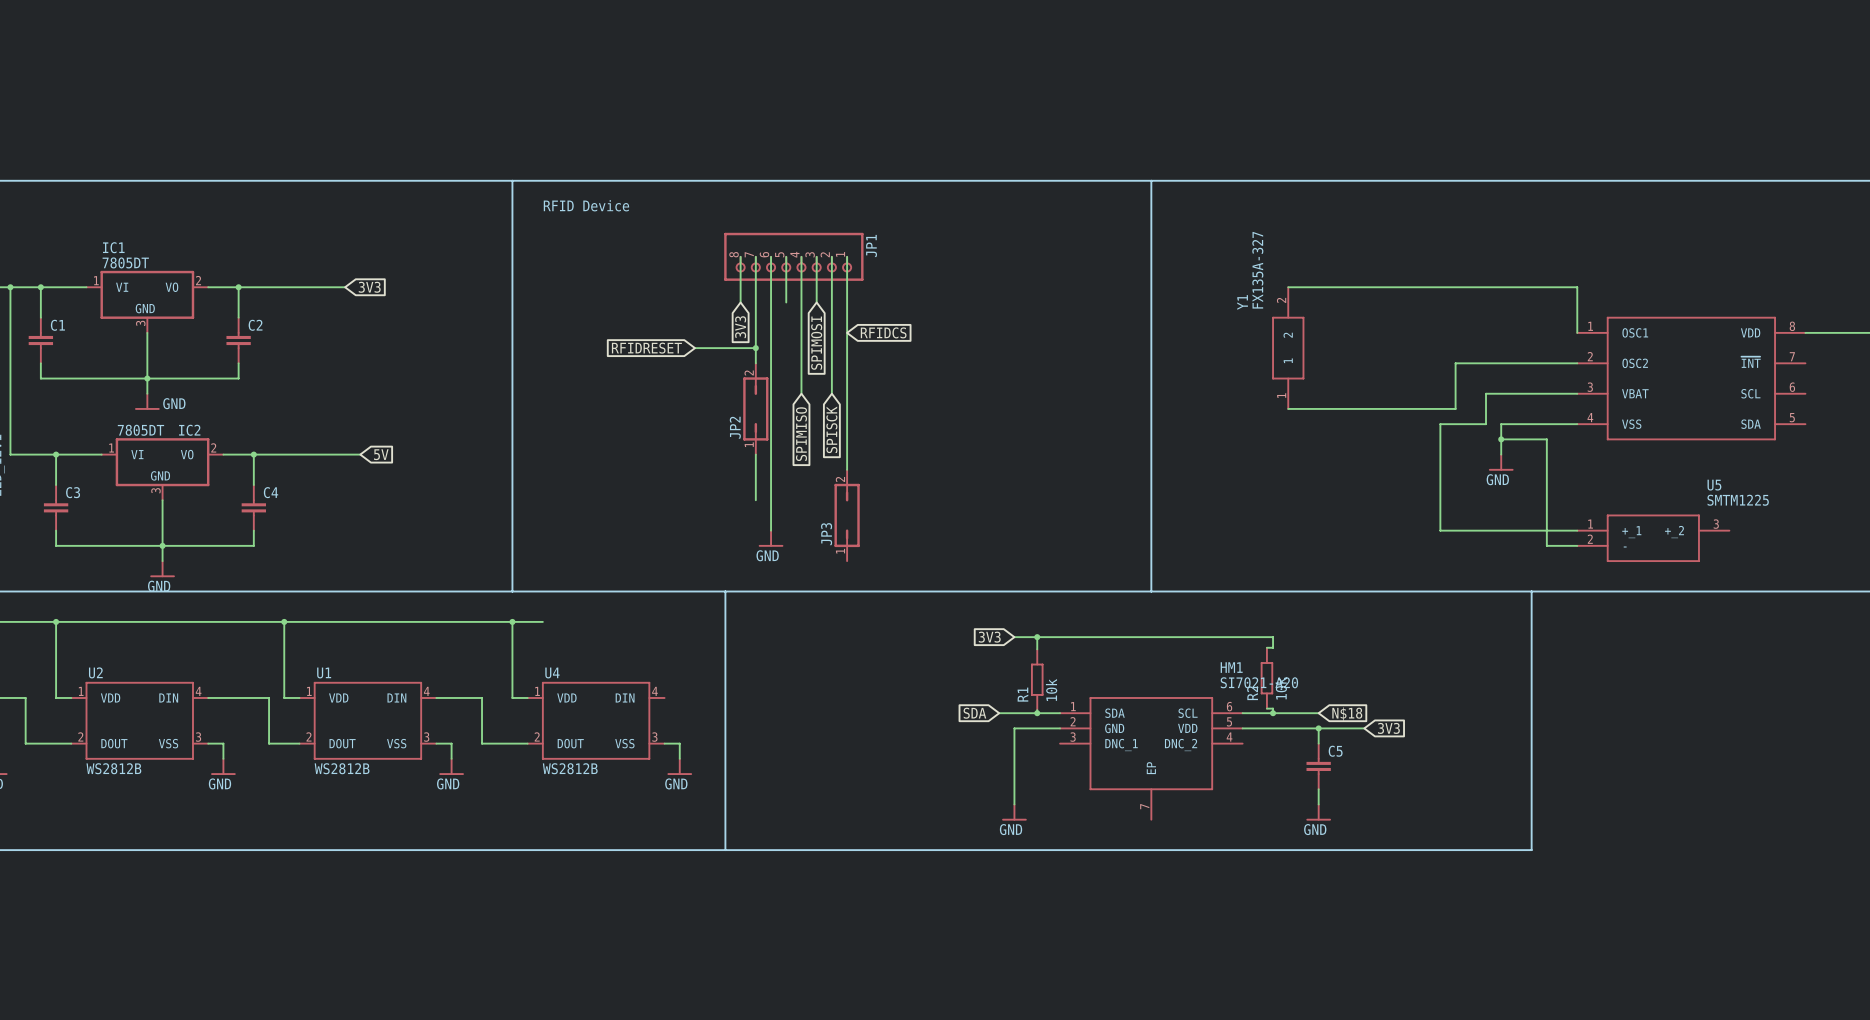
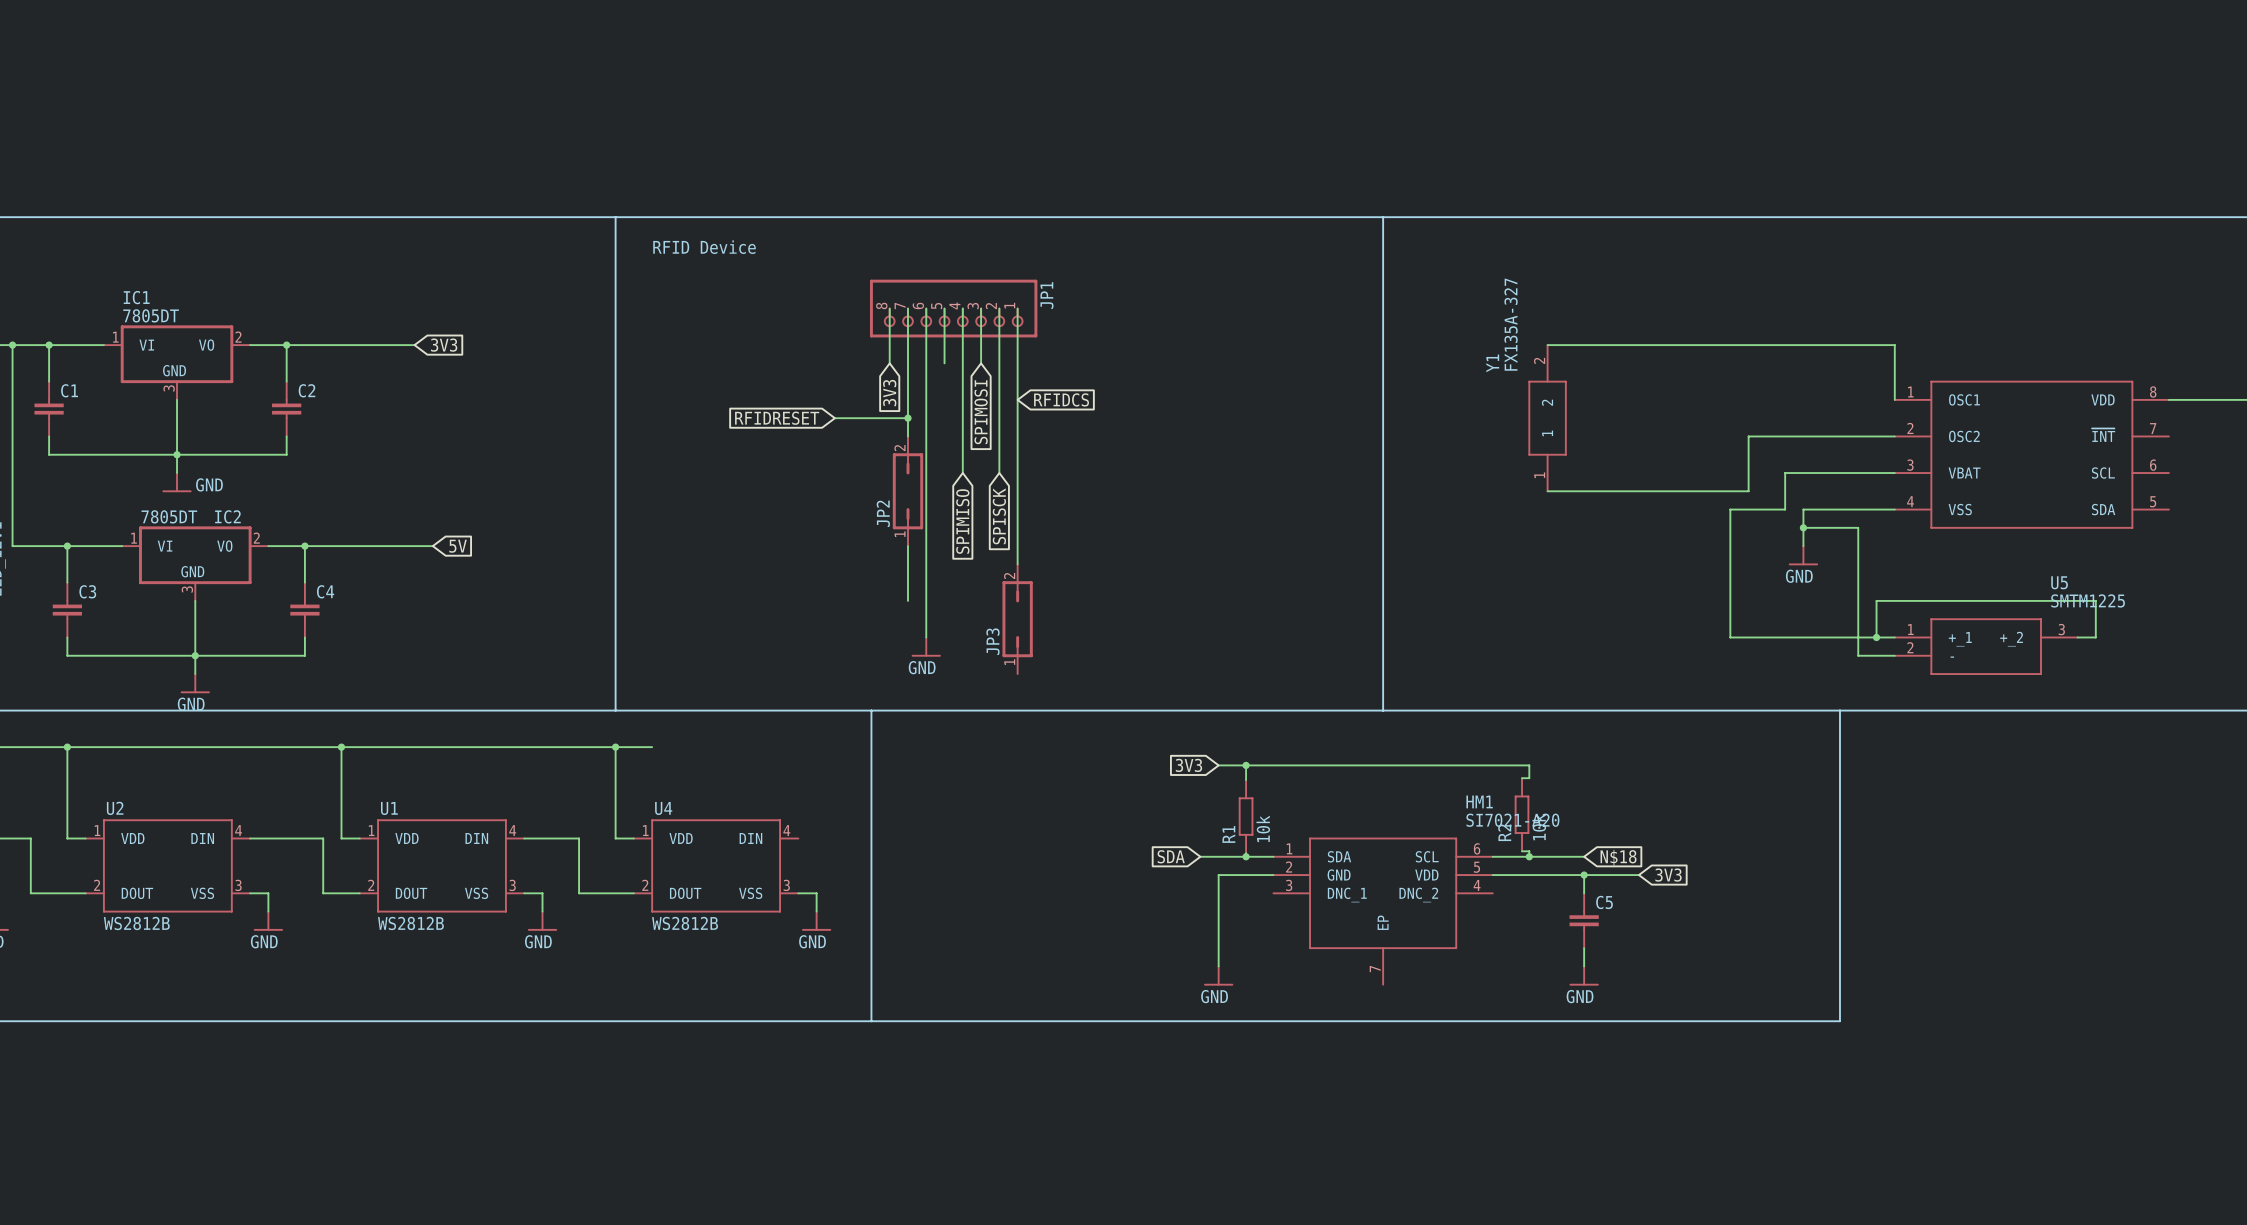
wire: none -> (1876, 637) (1876, 600) (2095, 600) (2095, 637) (2077, 637)
junction: none -> (1876, 637)

